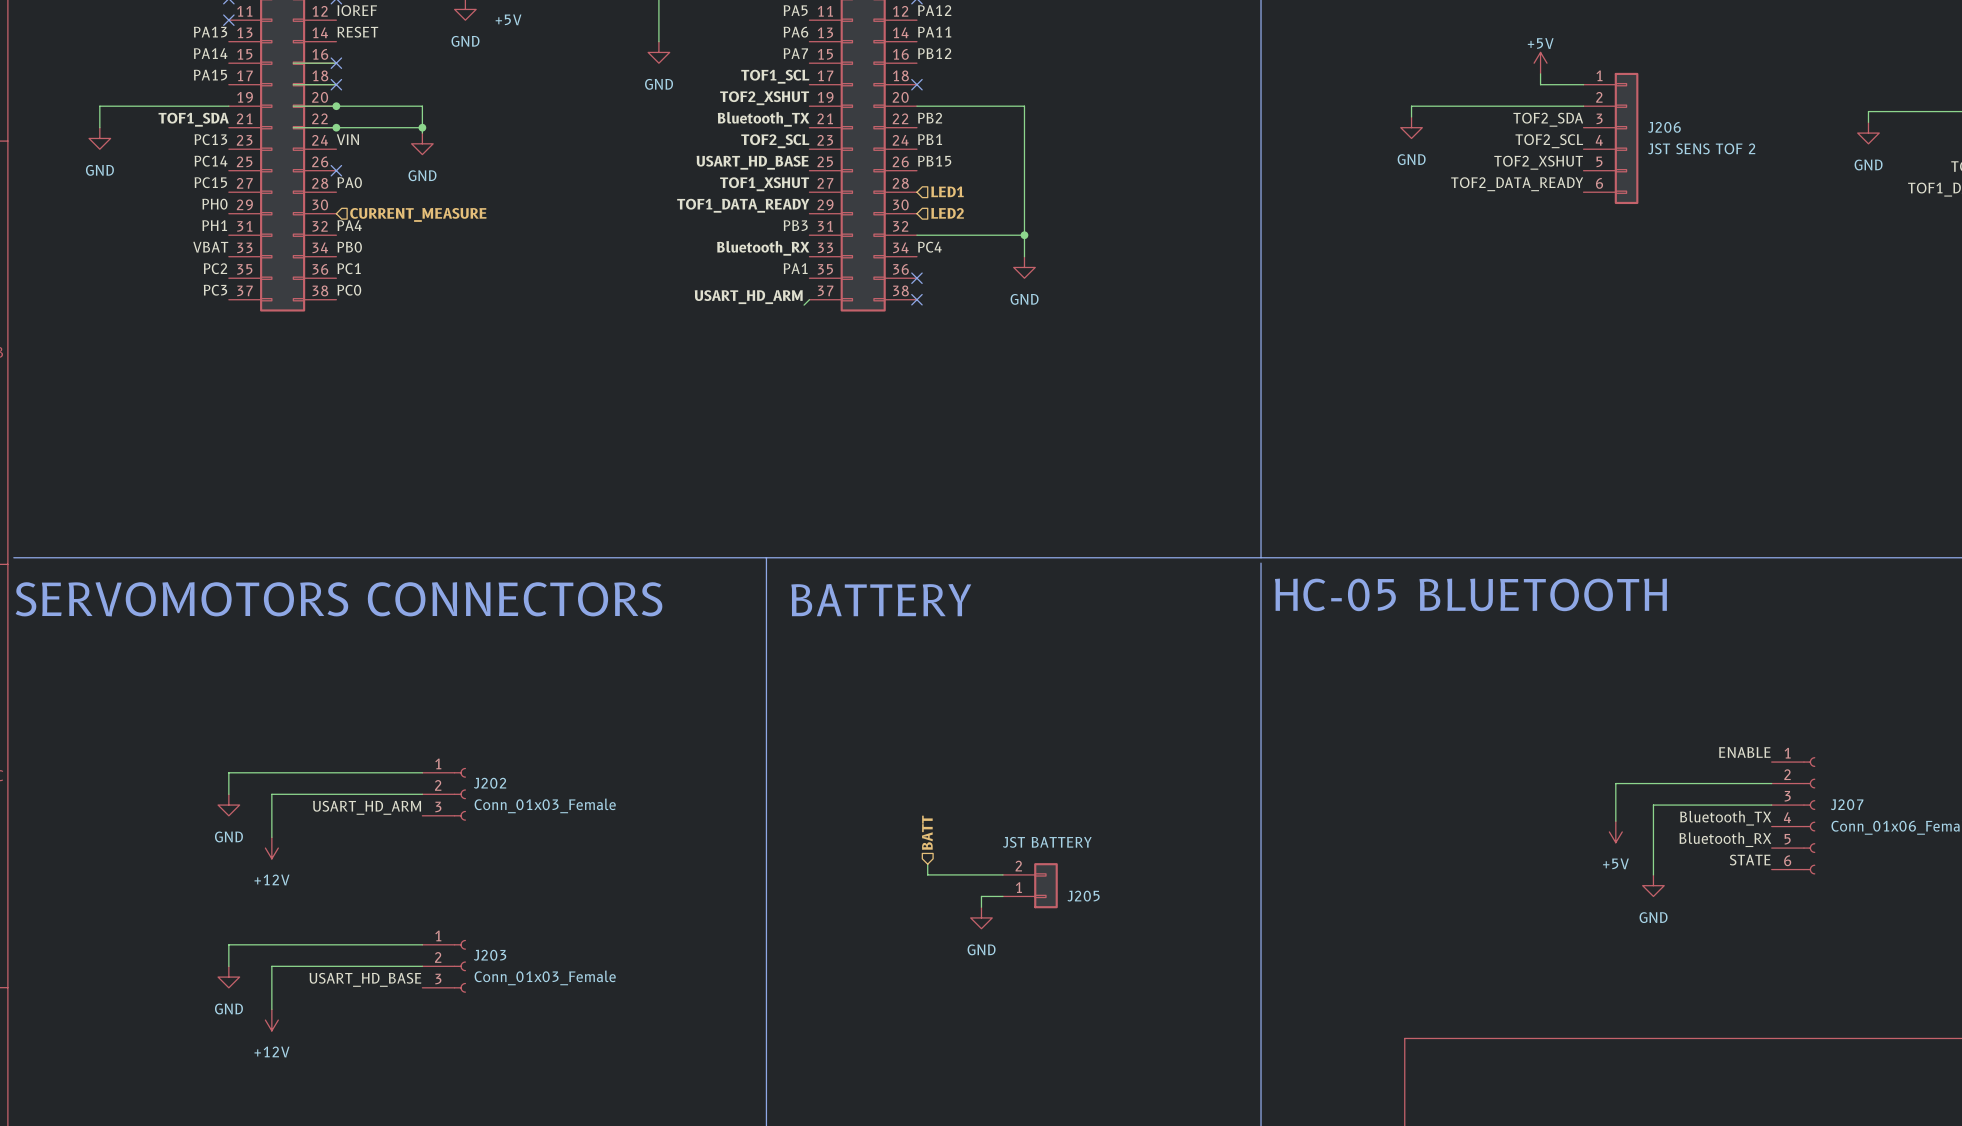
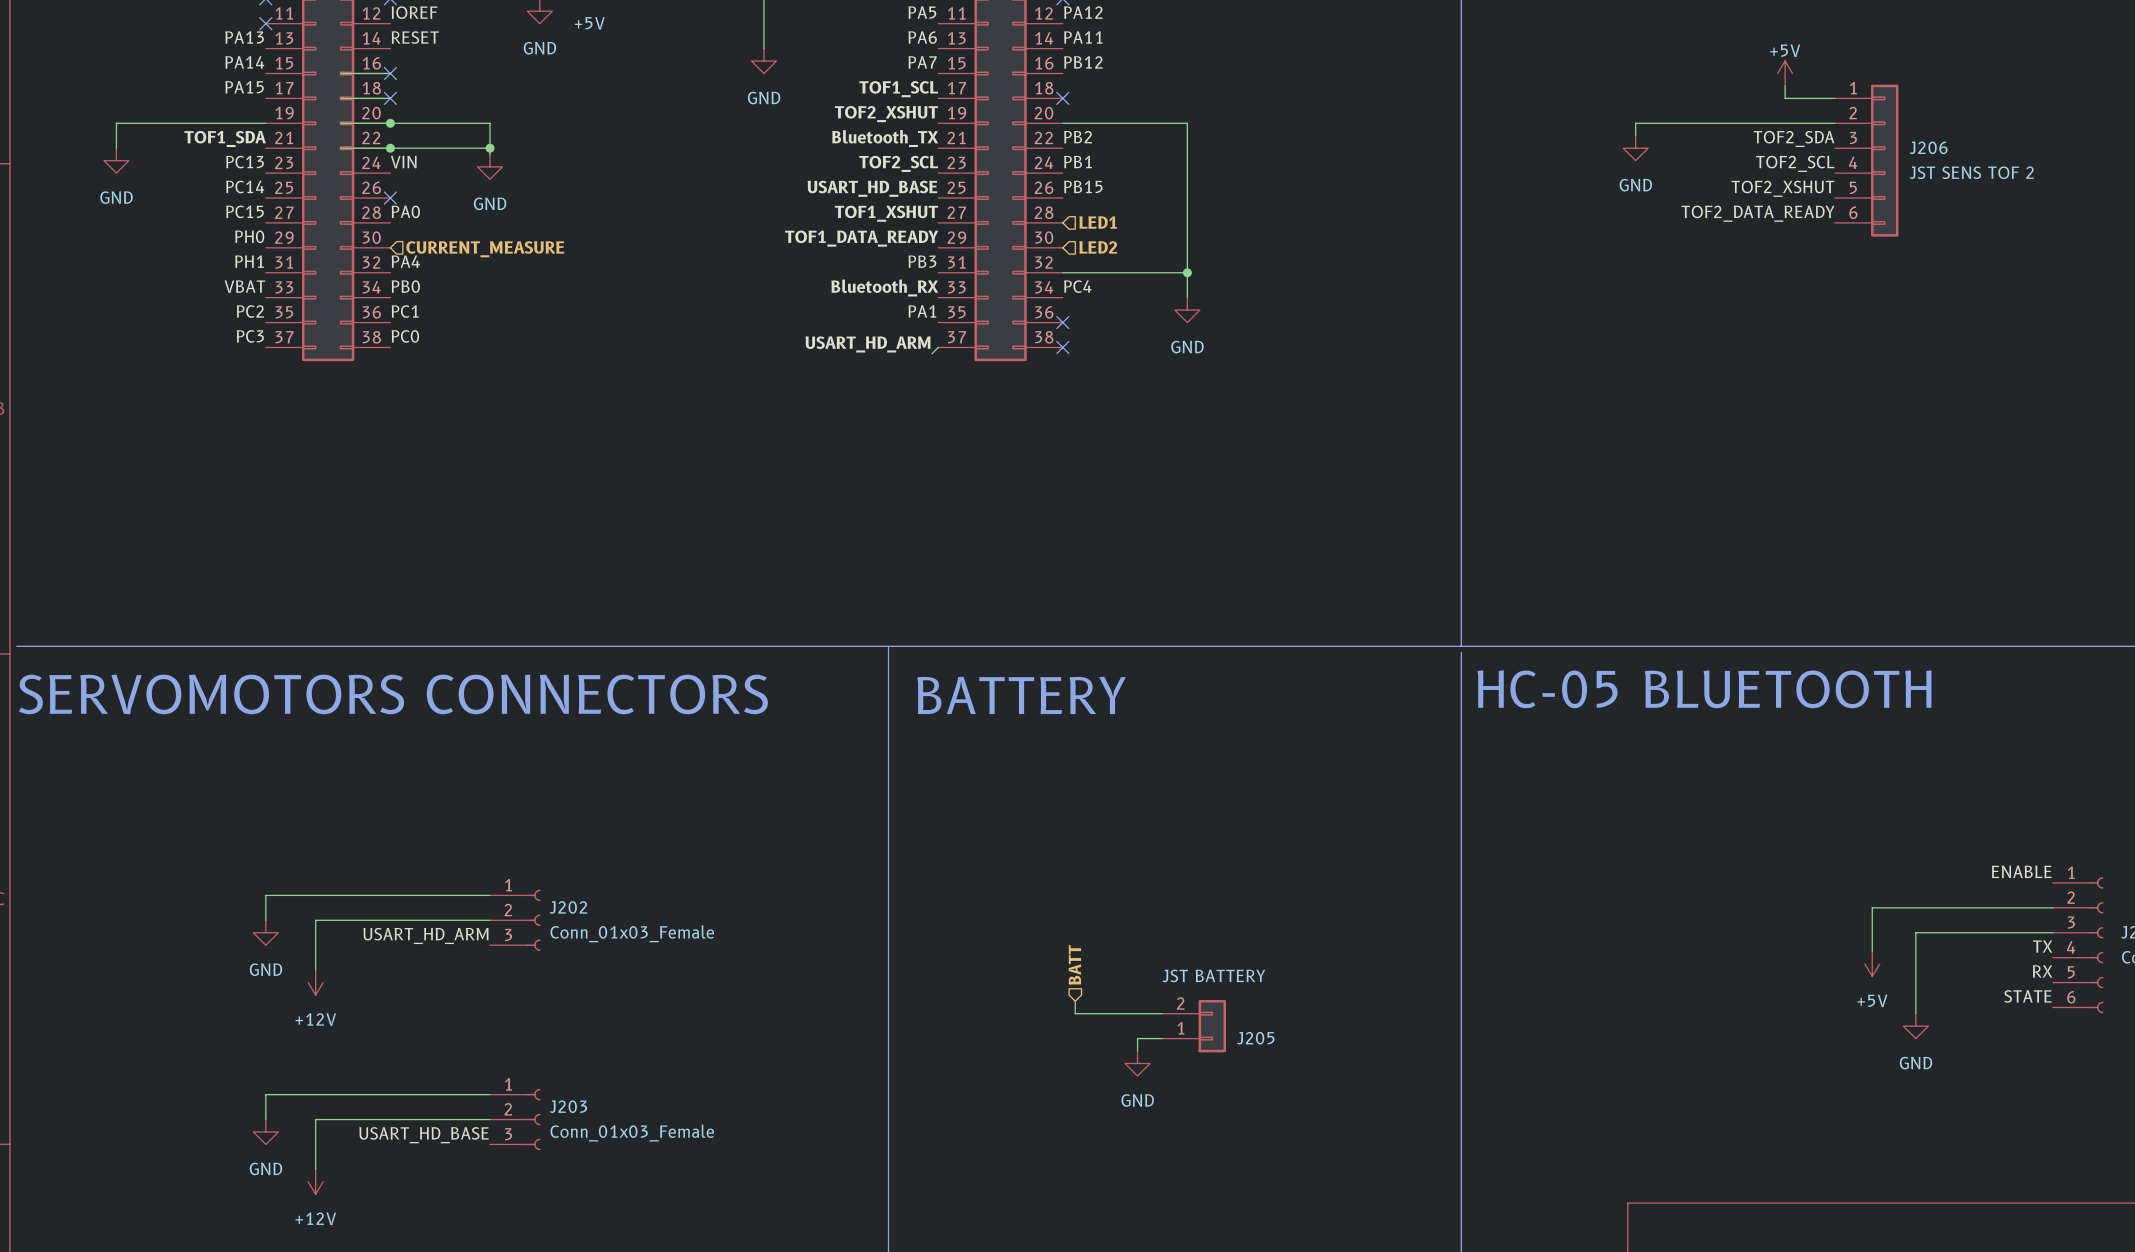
label: Bluetooth_TX (1725, 818) -> TX (2042, 946)
label: Bluetooth_RX (1725, 839) -> RX (2042, 971)

